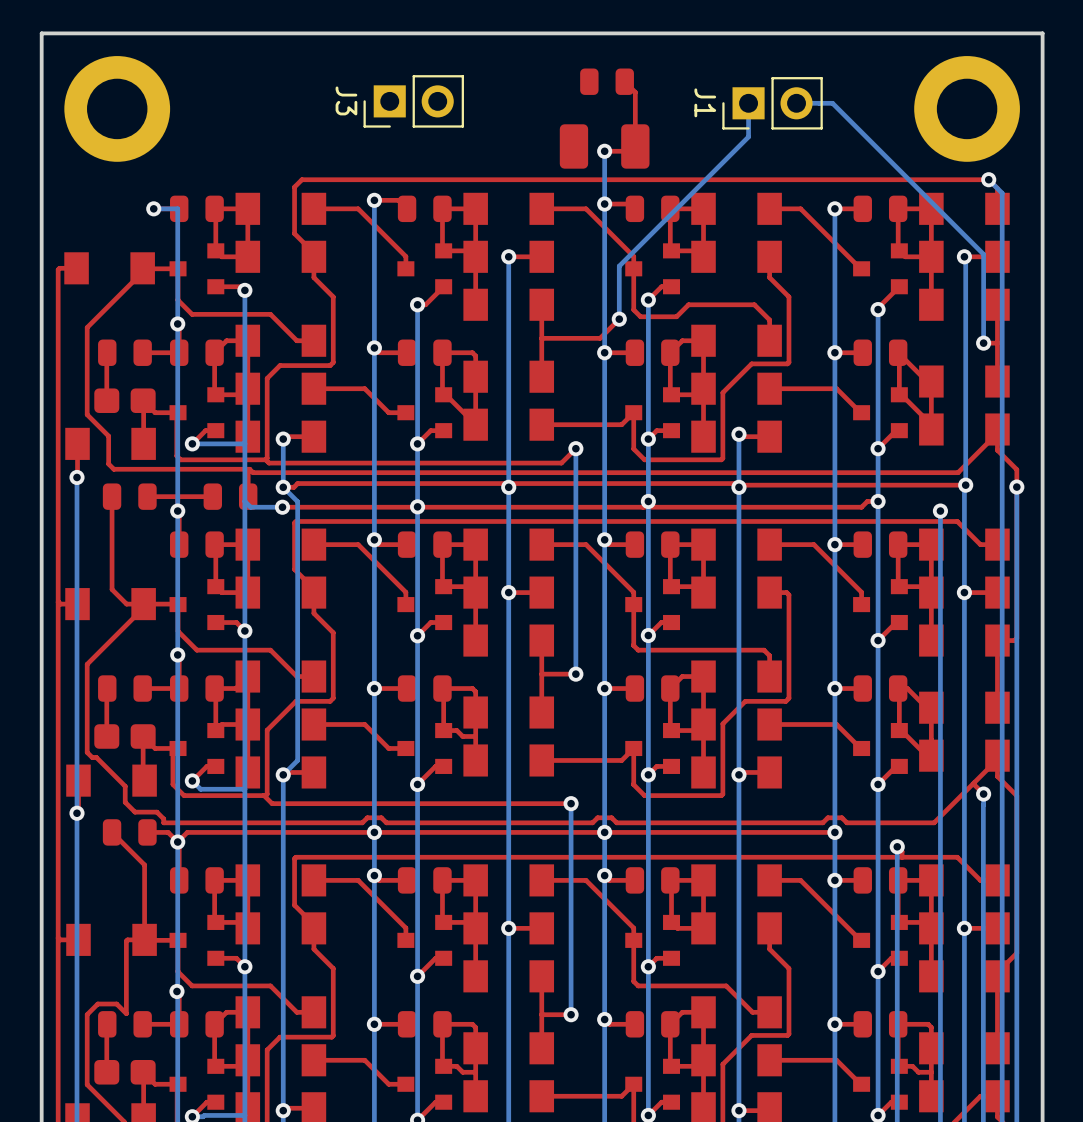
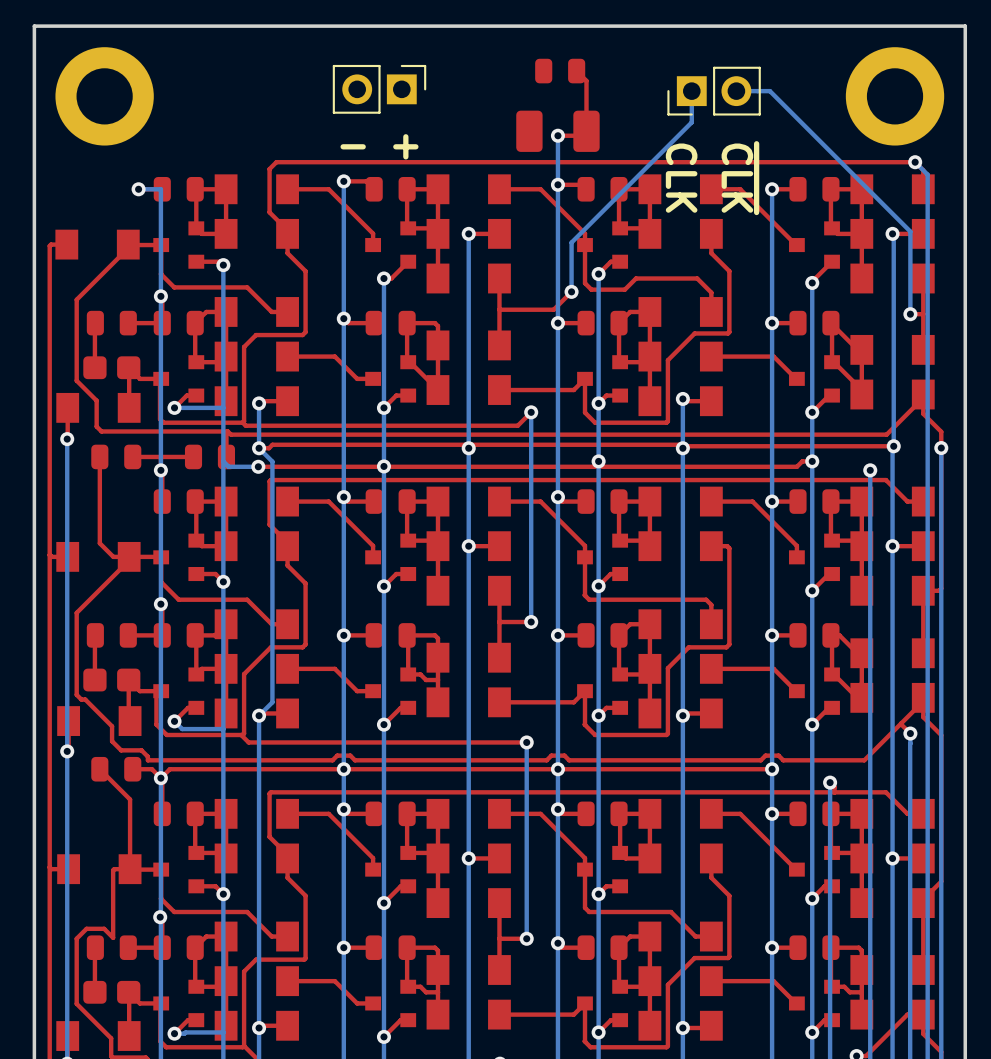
part: none -> (379, 89)
J3: (413, 101) -> none
J1 name: J1 (705, 102) -> none
text: none -> - + (379, 146)
text: none -> CLK (681, 178)
text: none -> ~{CLK} (740, 178)

